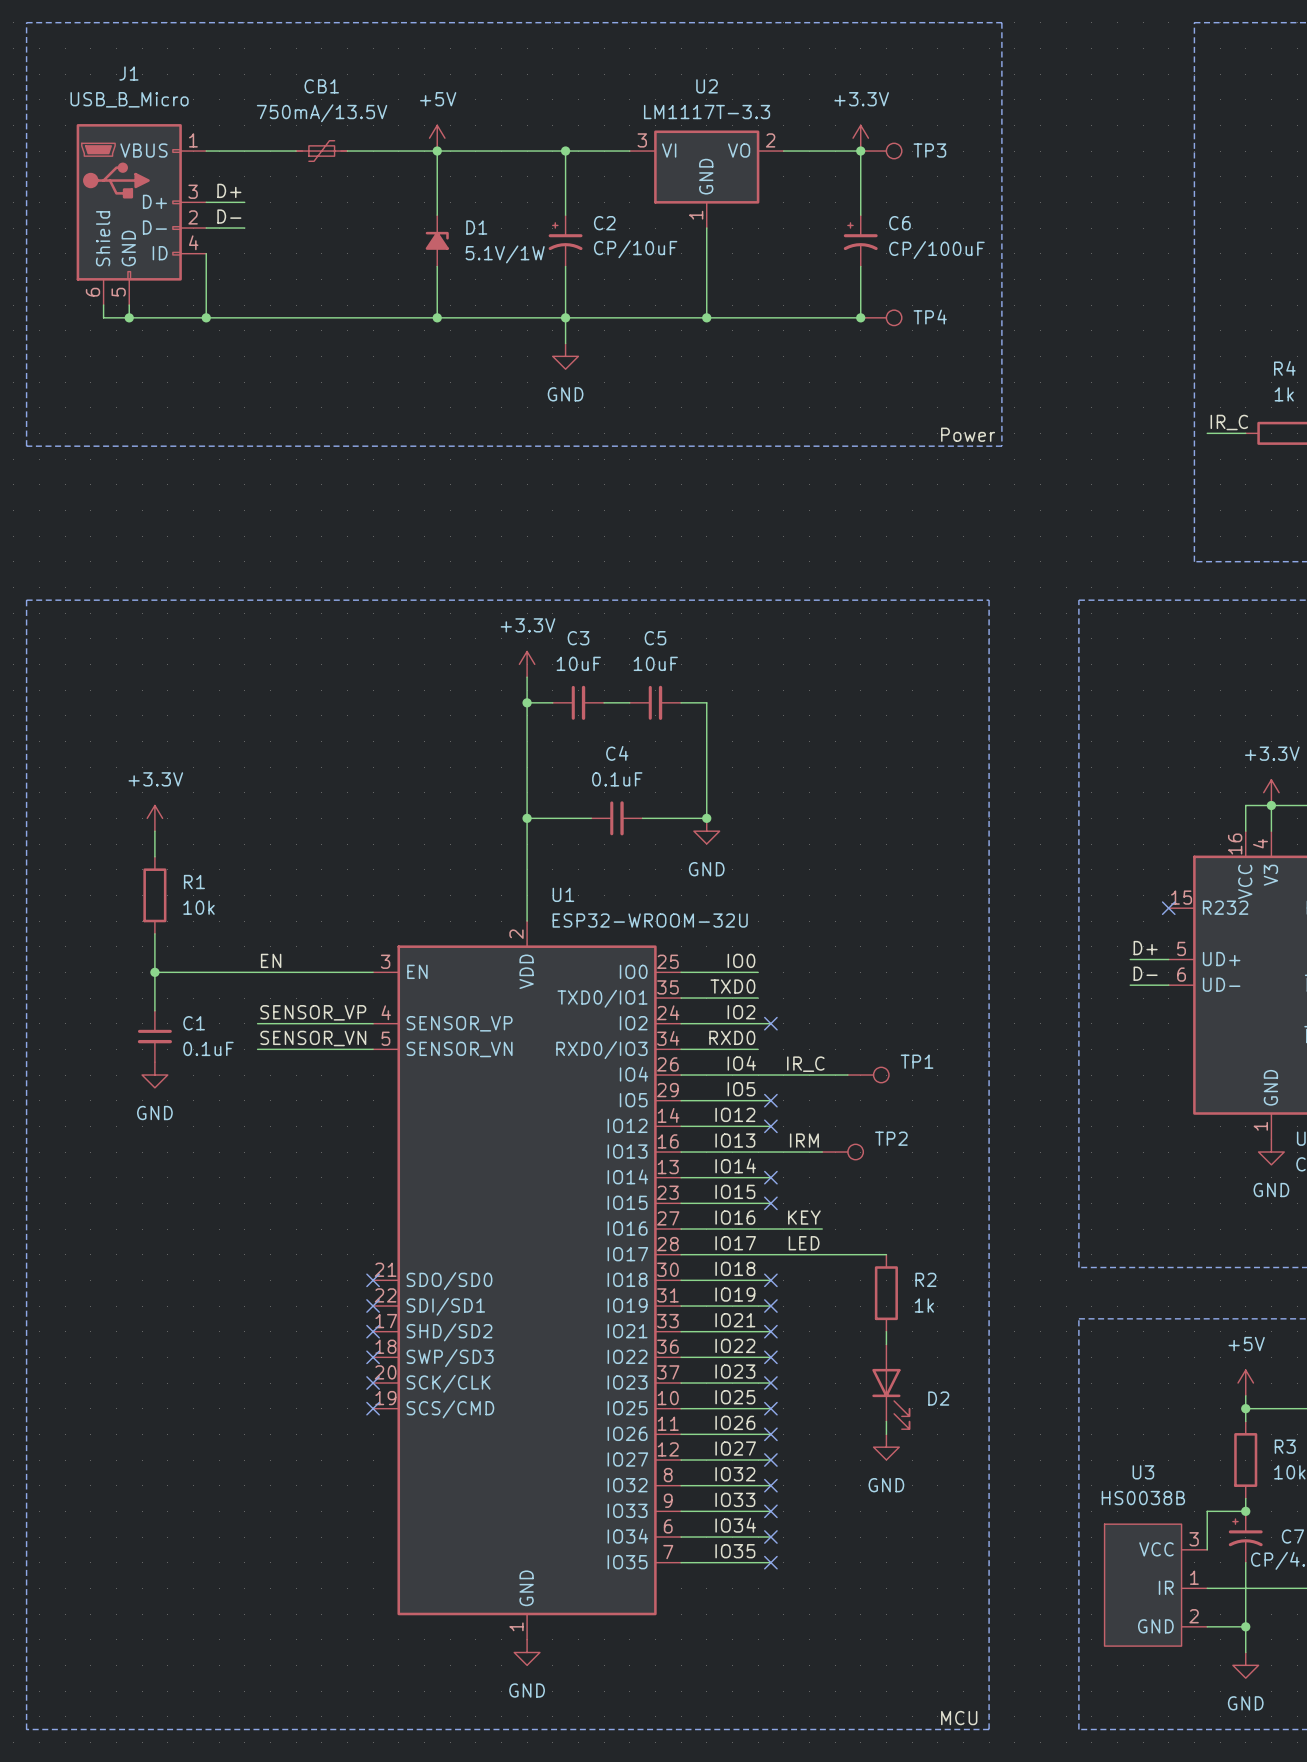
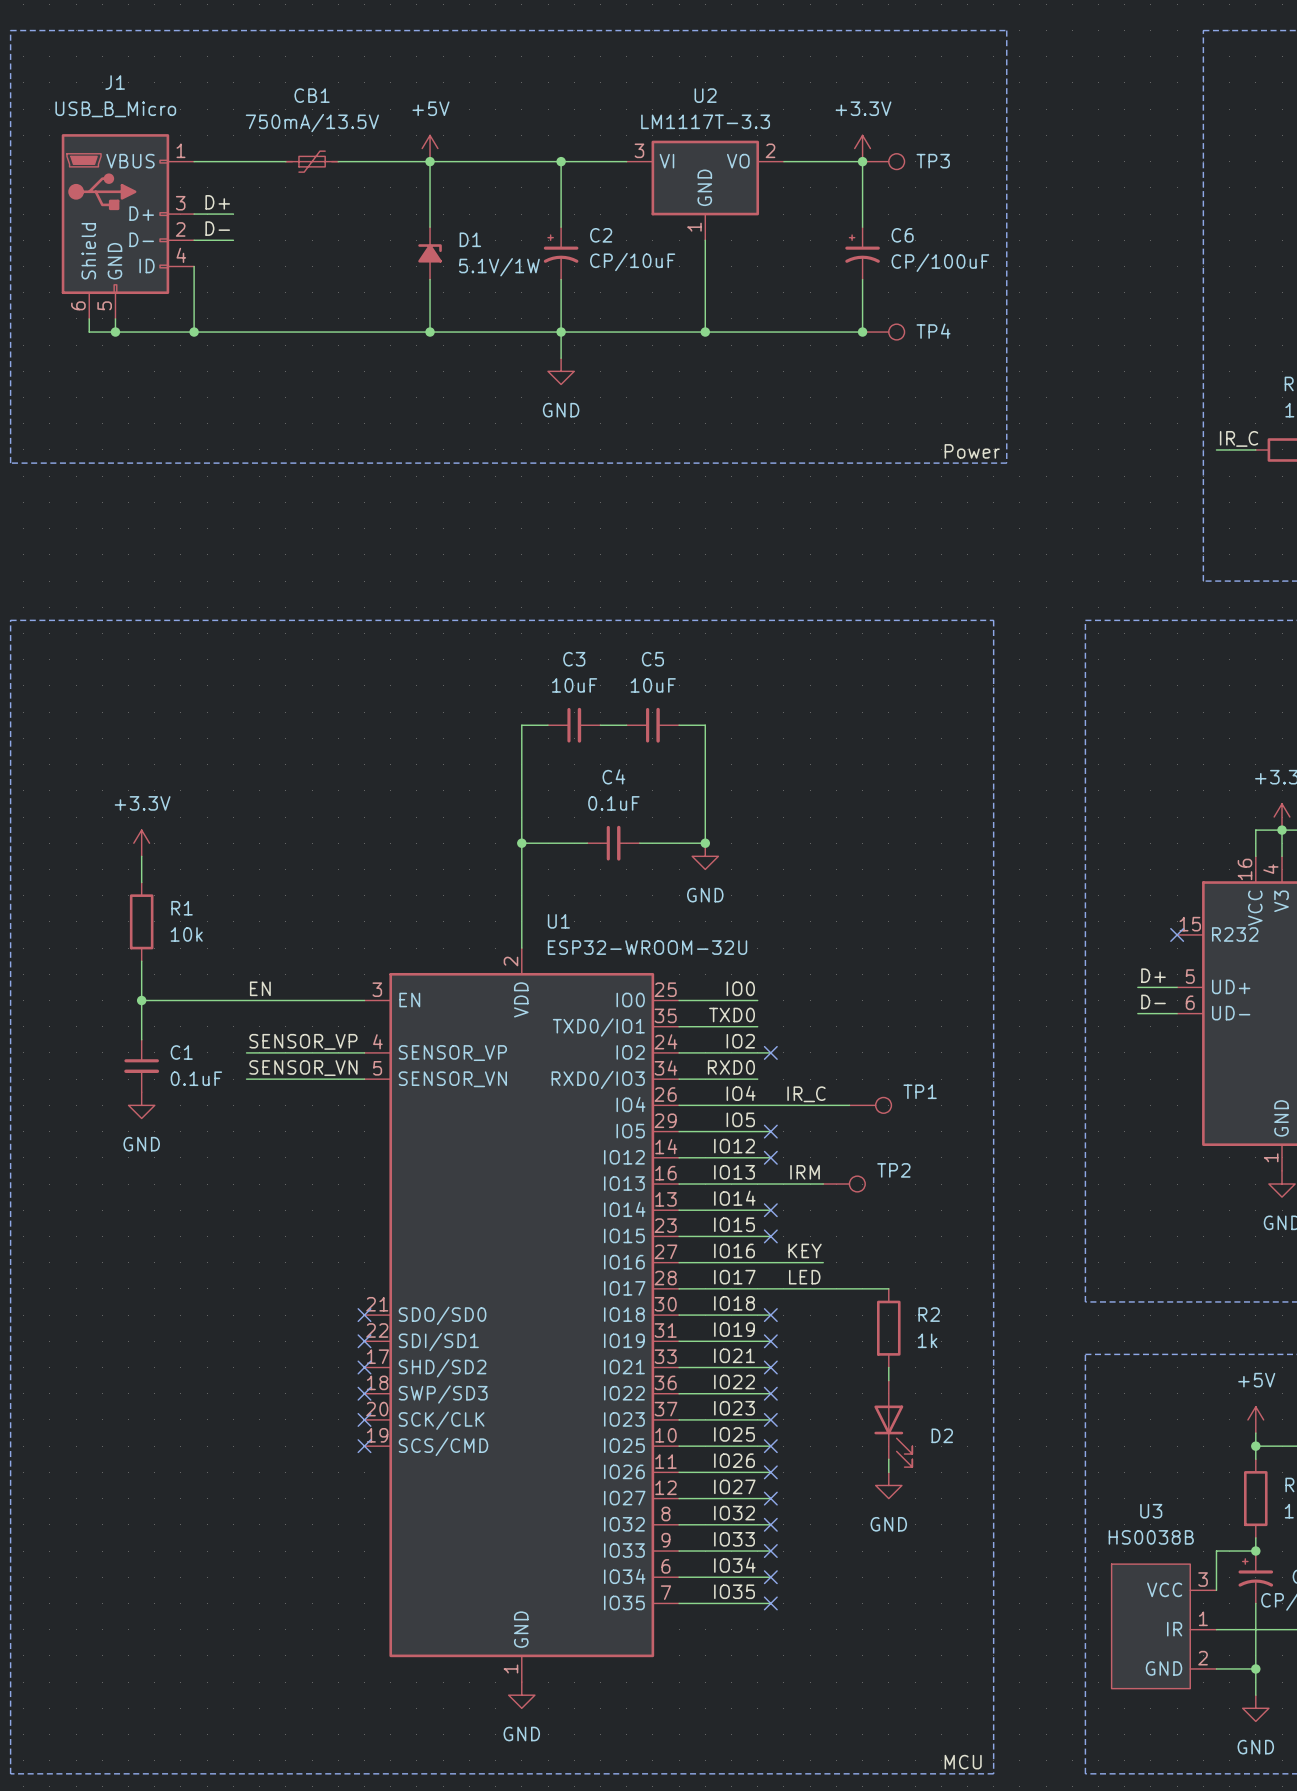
power symbol: +3.3V (527, 664) -> none
wire: (527, 677) (527, 702) -> none
junction: (527, 702) -> none

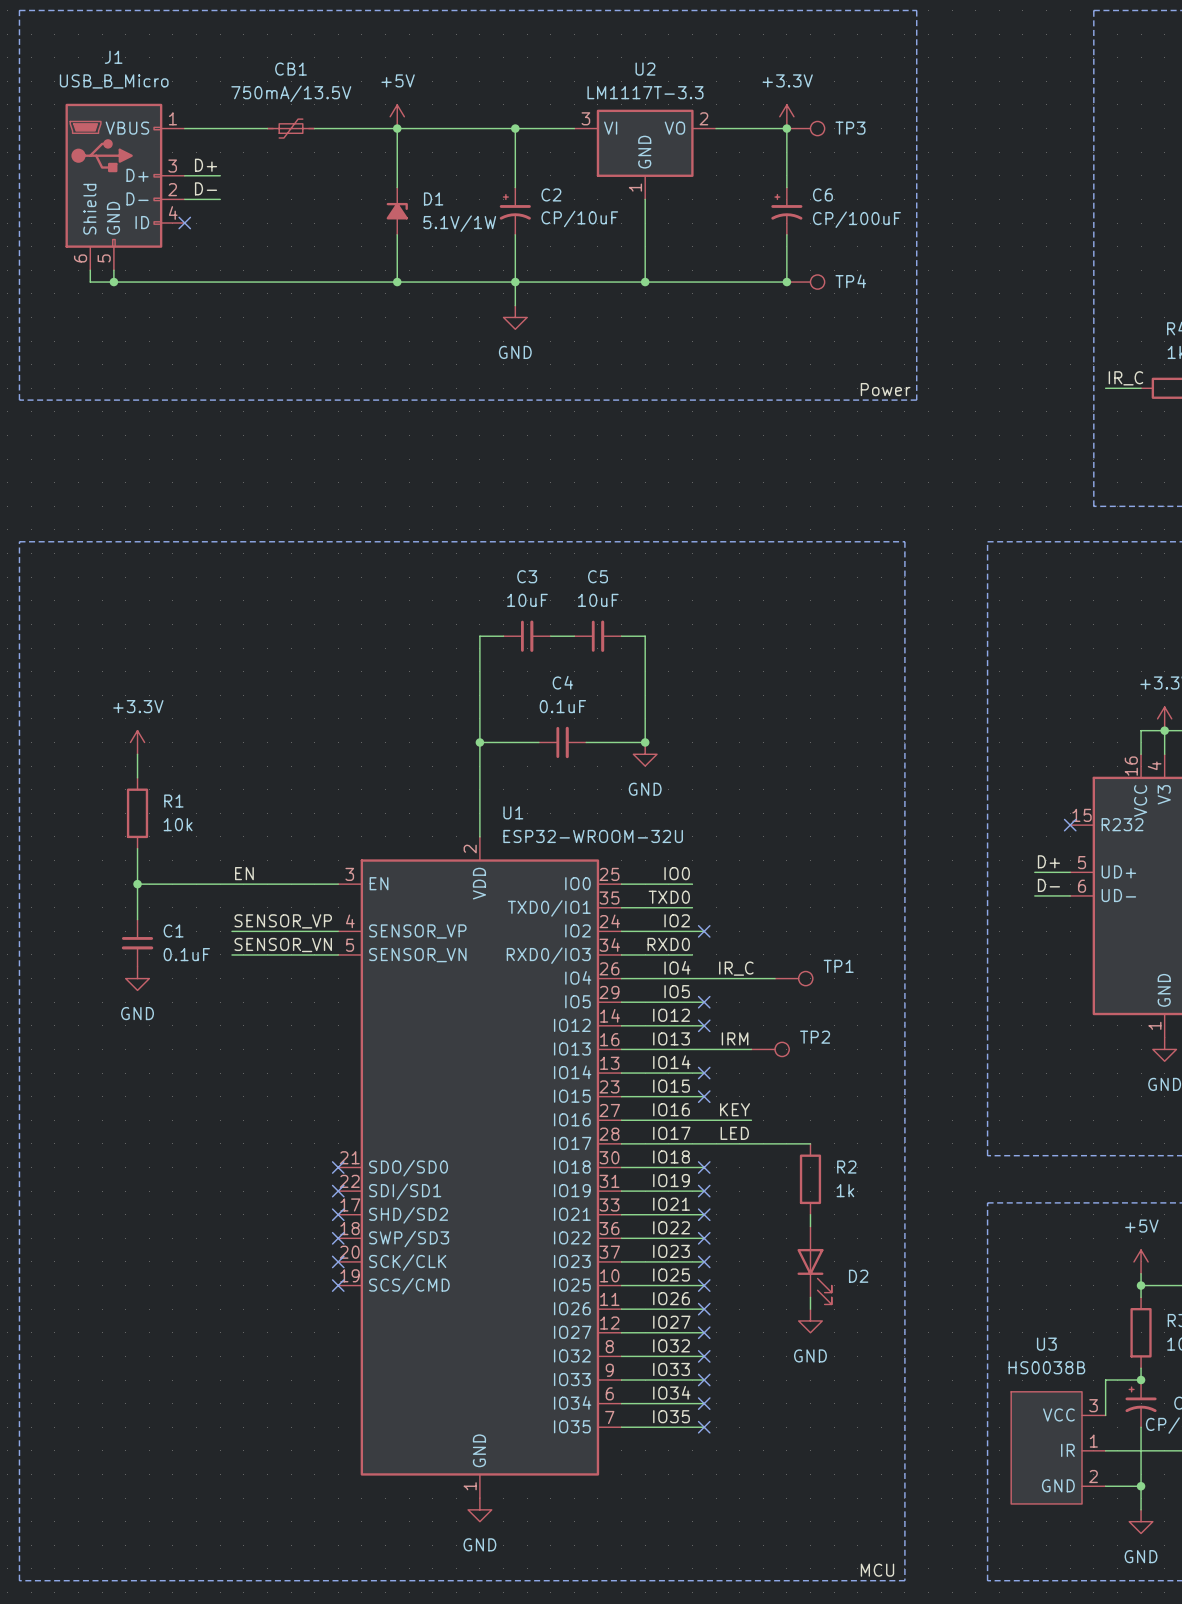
wire: (194, 266) (194, 332) -> none
no-connect mark: none -> (184, 223)
junction: (194, 332) -> none

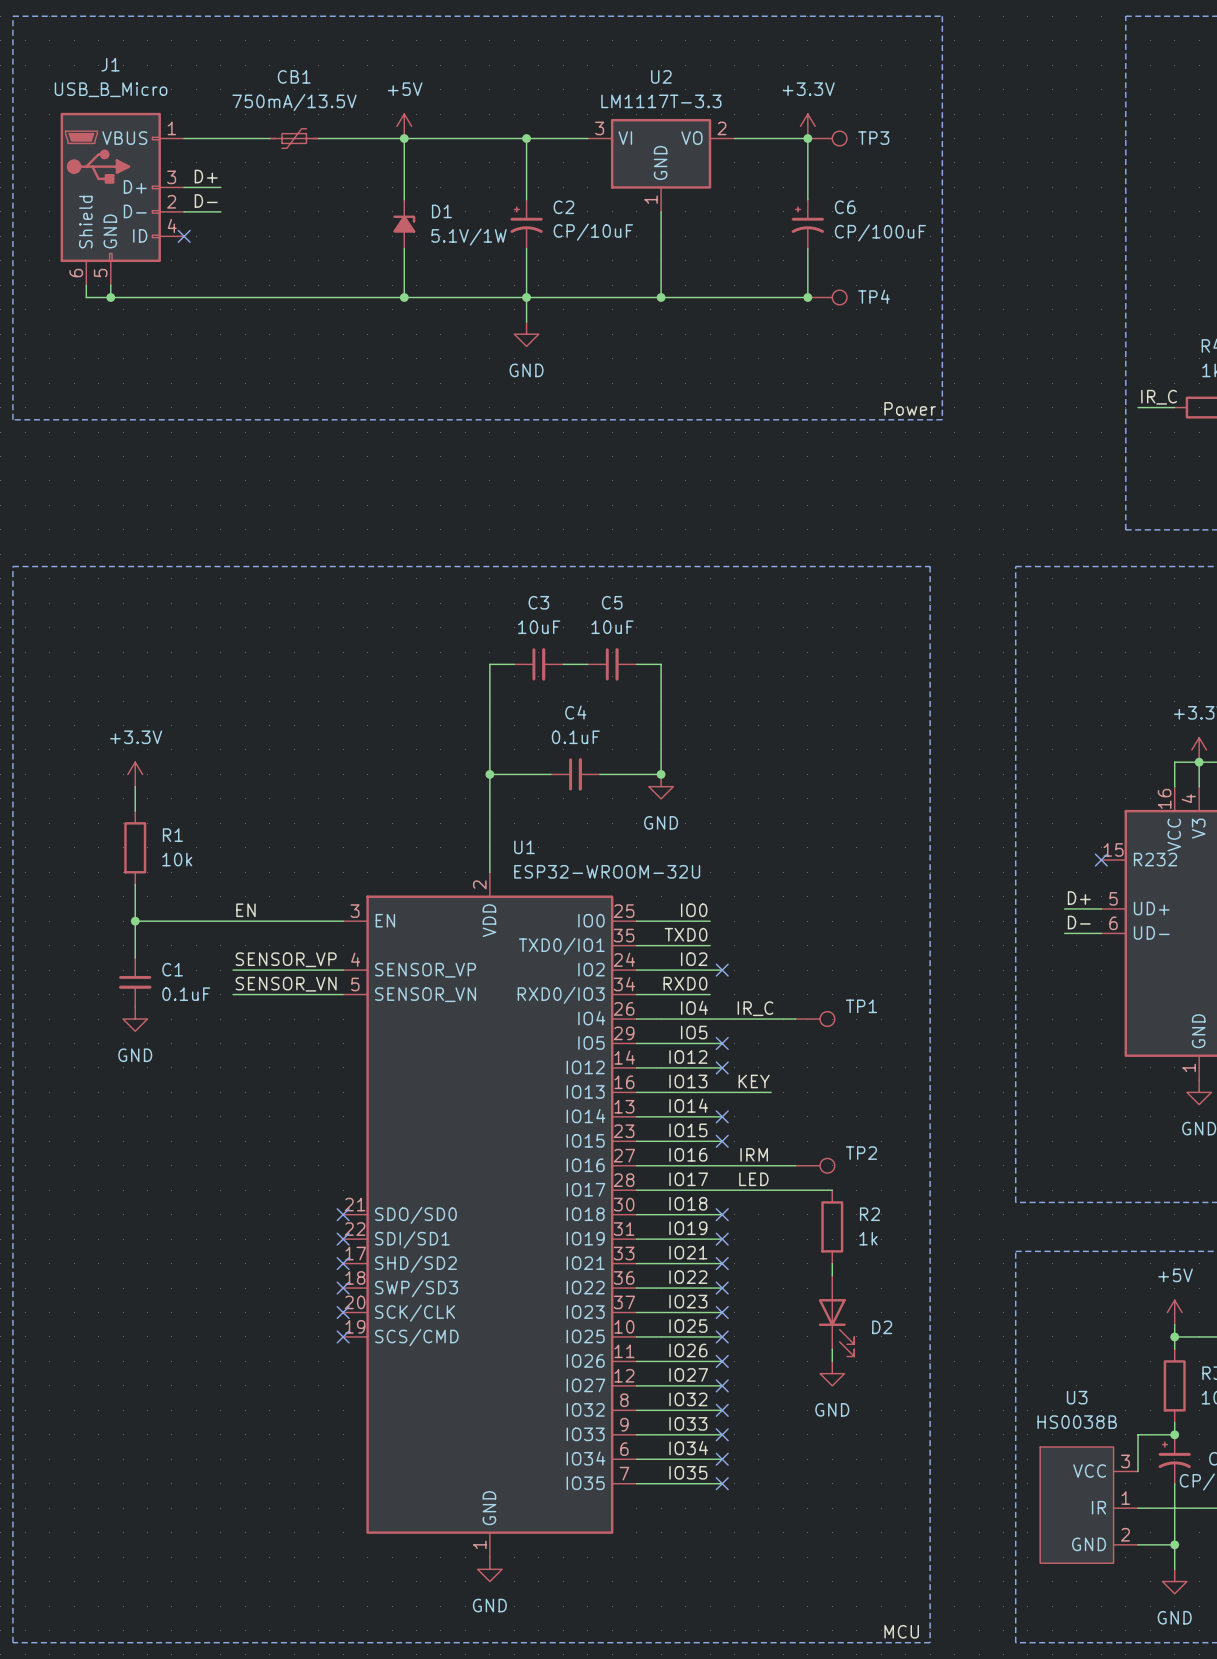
label: IRM (735, 1038) -> KEY (754, 1081)
TP2 position: (770, 1049) -> (815, 1165)
label: KEY (735, 1109) -> IRM (754, 1154)
wire: none -> (771, 1165) (795, 1165)

